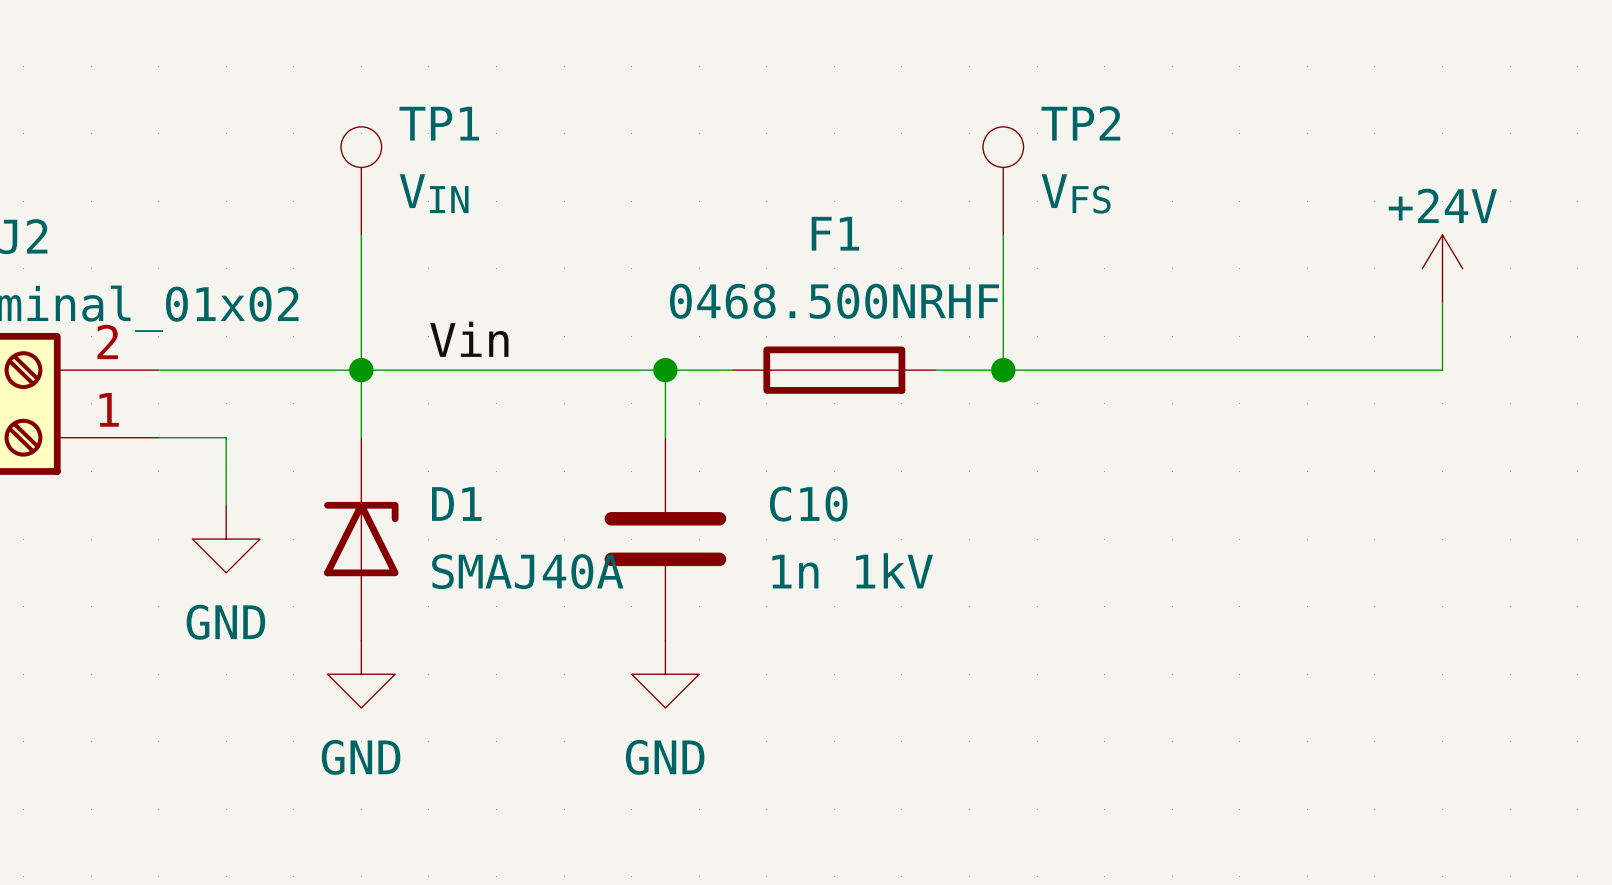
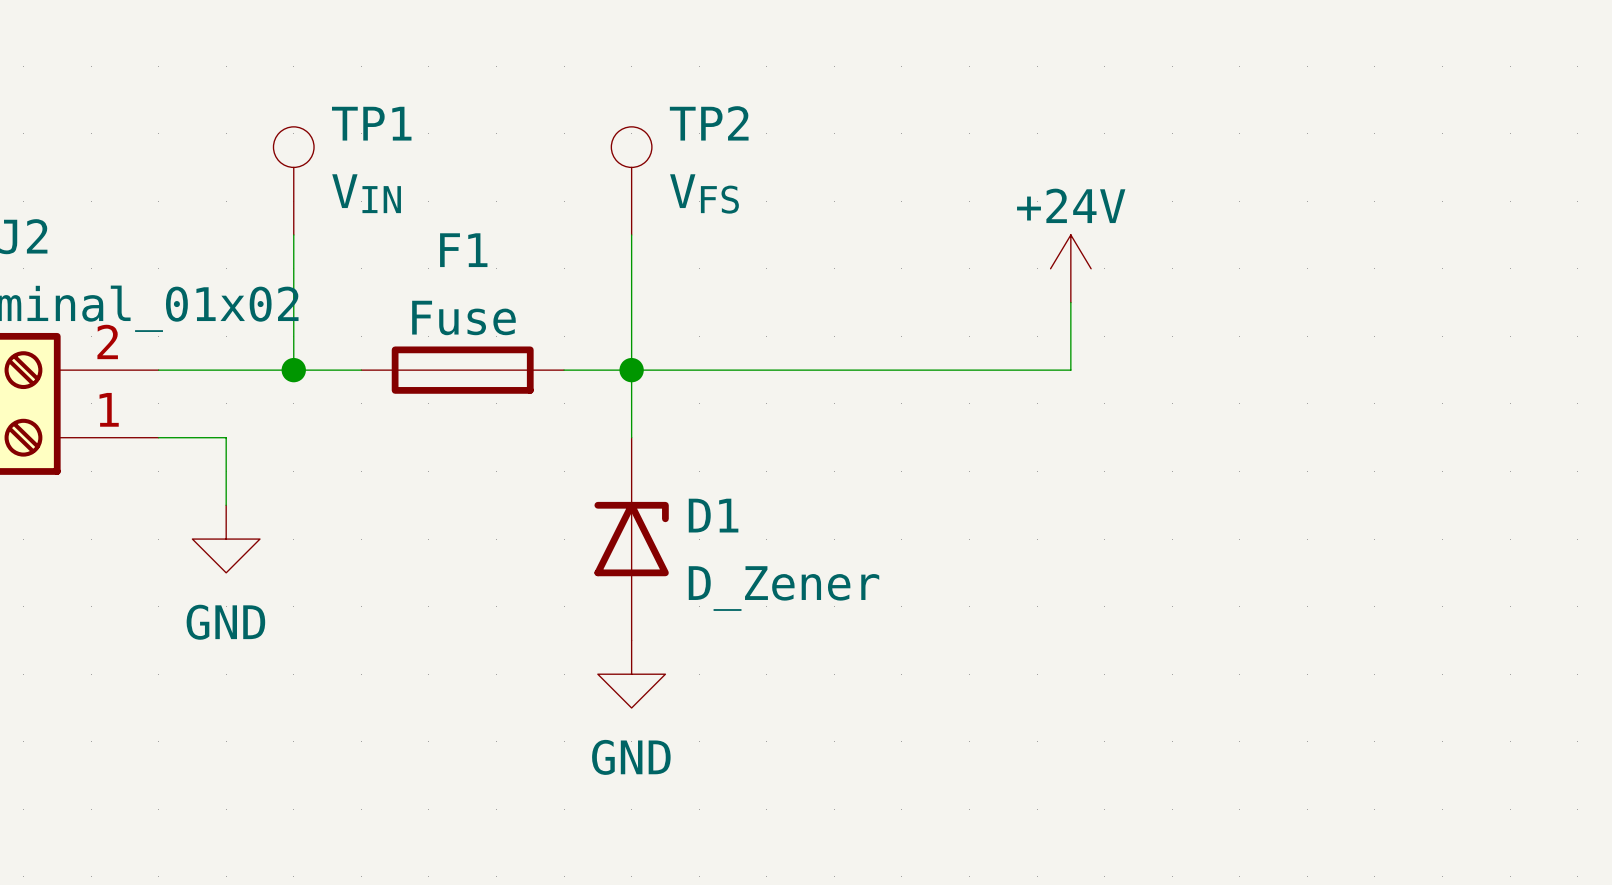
TP1 position: (361, 180) -> (293, 180)
TP2 position: (1003, 180) -> (631, 180)
F1 name position: F1 (835, 233) -> F1 (463, 250)
wire: none -> (293, 234) (293, 370)
wire: (361, 234) (361, 437) -> (631, 234) (631, 437)
wire: (1003, 234) (1003, 370) -> none
power symbol position: +24V (1442, 268) -> +24V (1070, 268)
F1 value: 0468.500NRHF (834, 301) -> Fuse (463, 317)
wire: (1442, 302) (1442, 370) (1070, 370) -> (1070, 302) (1070, 370)
label: Vin (469, 339) -> none
junction position: (361, 370) -> (293, 370)
wire: (665, 370) (665, 437) -> none
junction position: (665, 370) -> (631, 370)
F1 position: (834, 370) -> (462, 370)
junction: (1003, 370) -> none
D1 name position: D1 (456, 504) -> D1 (713, 515)
D1 position: (361, 539) -> (631, 539)
C10: 1n 1kV (665, 539) -> none
D1 value: SMAJ40A (527, 571) -> D_Zener (784, 588)
power symbol: GND (361, 674) -> none
power symbol position: GND (665, 674) -> GND (631, 674)

